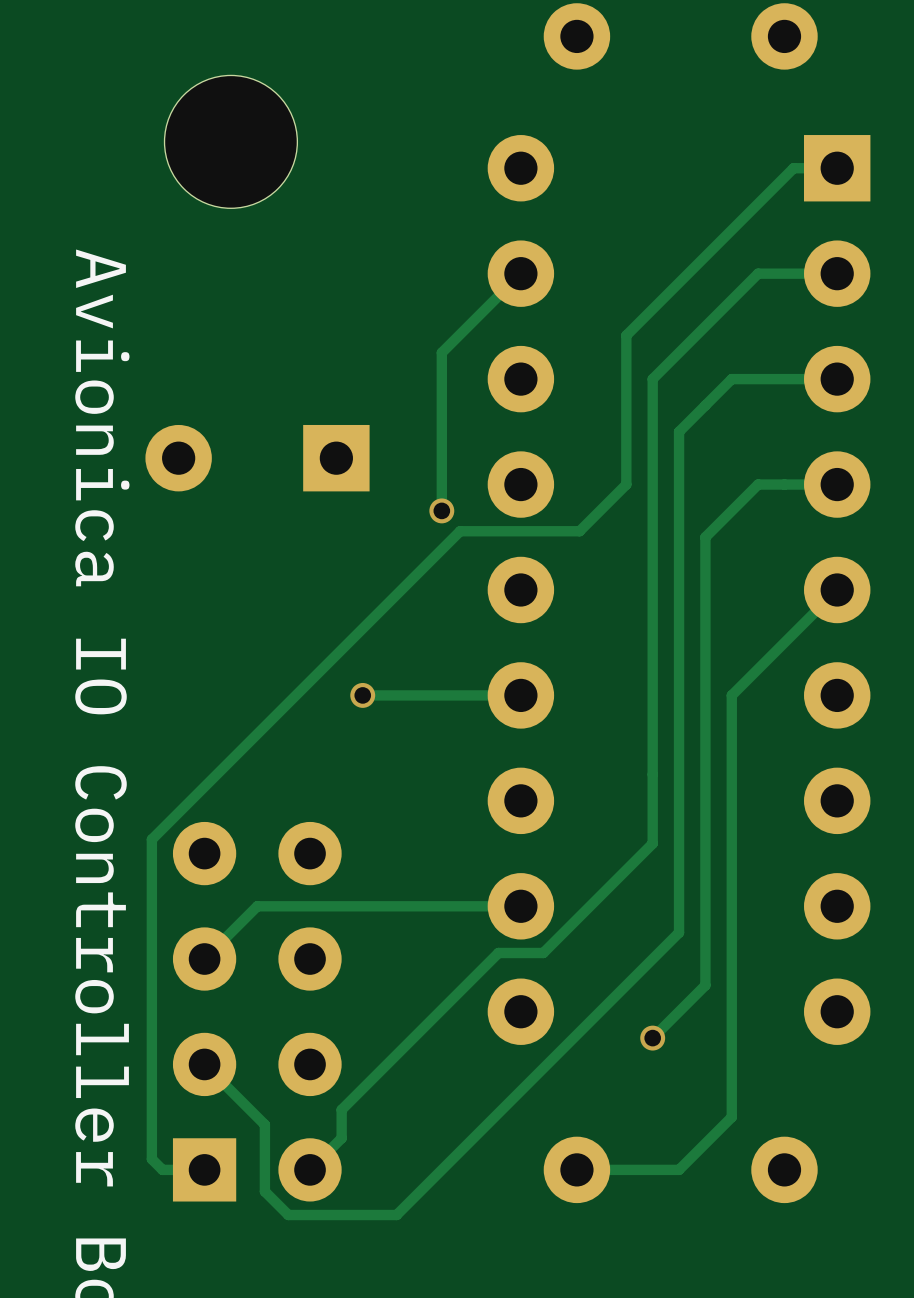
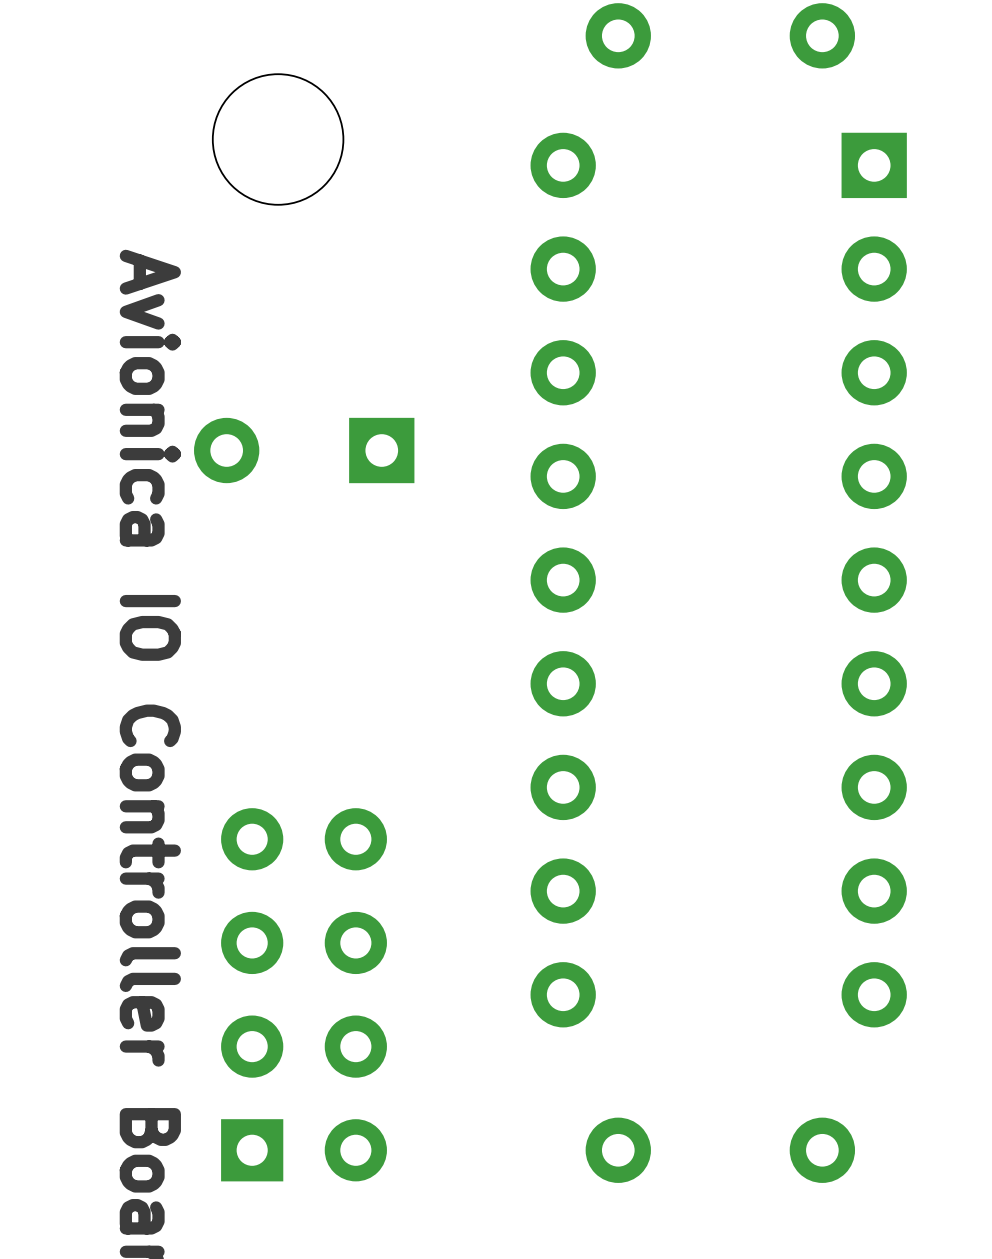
track: (837, 168) (793, 168) (626, 335) (626, 484) (579, 531) (460, 531) (151, 839) (151, 1159) (162, 1169) (204, 1169) -> none
track: (520, 273) (441, 352) (441, 510) -> none
track: (837, 273) (758, 273) (652, 379) (652, 843) (543, 952) (498, 952) (341, 1109) (341, 1138) (310, 1169) -> none
track: (837, 379) (731, 379) (679, 431) (679, 932) (396, 1215) (288, 1215) (264, 1191) (264, 1124) (204, 1064) -> none
track: (837, 484) (758, 484) (705, 537) (705, 985) (652, 1038) -> none
via: (441, 510) -> none
track: (837, 589) (731, 695) (731, 1117) (679, 1169) (576, 1169) -> none
via: (362, 695) -> none
track: (520, 695) (362, 695) -> none
track: (520, 906) (257, 906) (204, 959) -> none
via: (652, 1038) -> none

